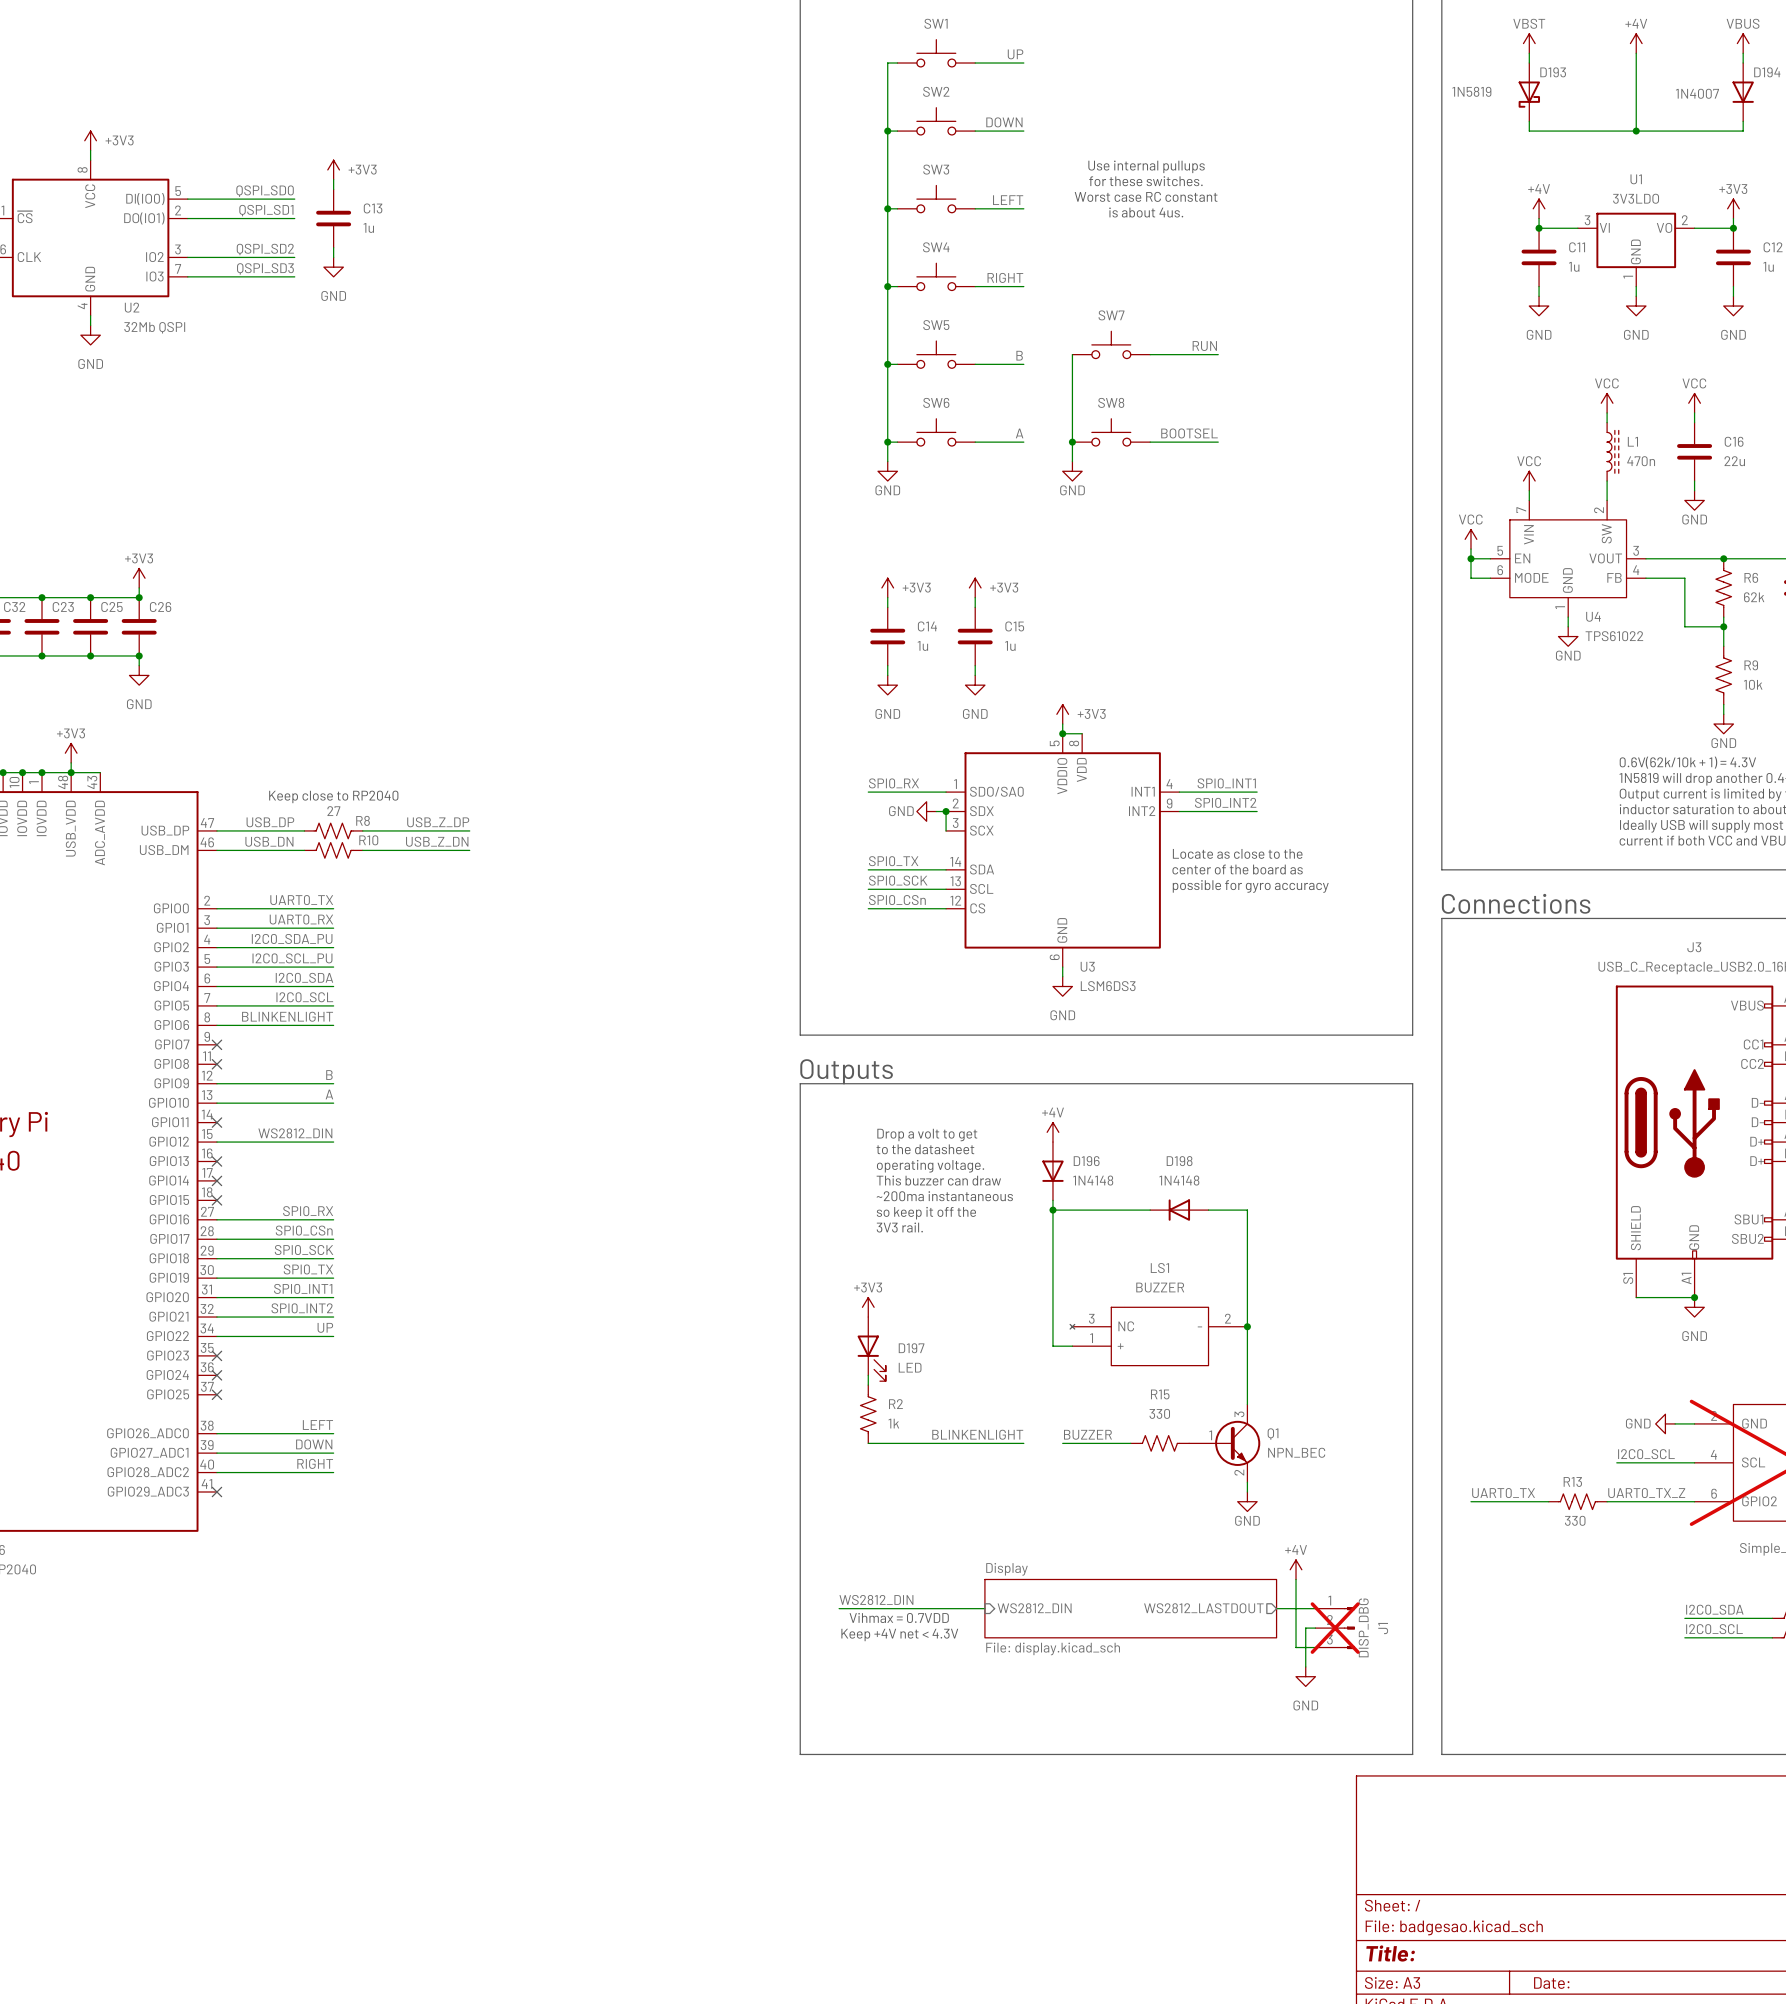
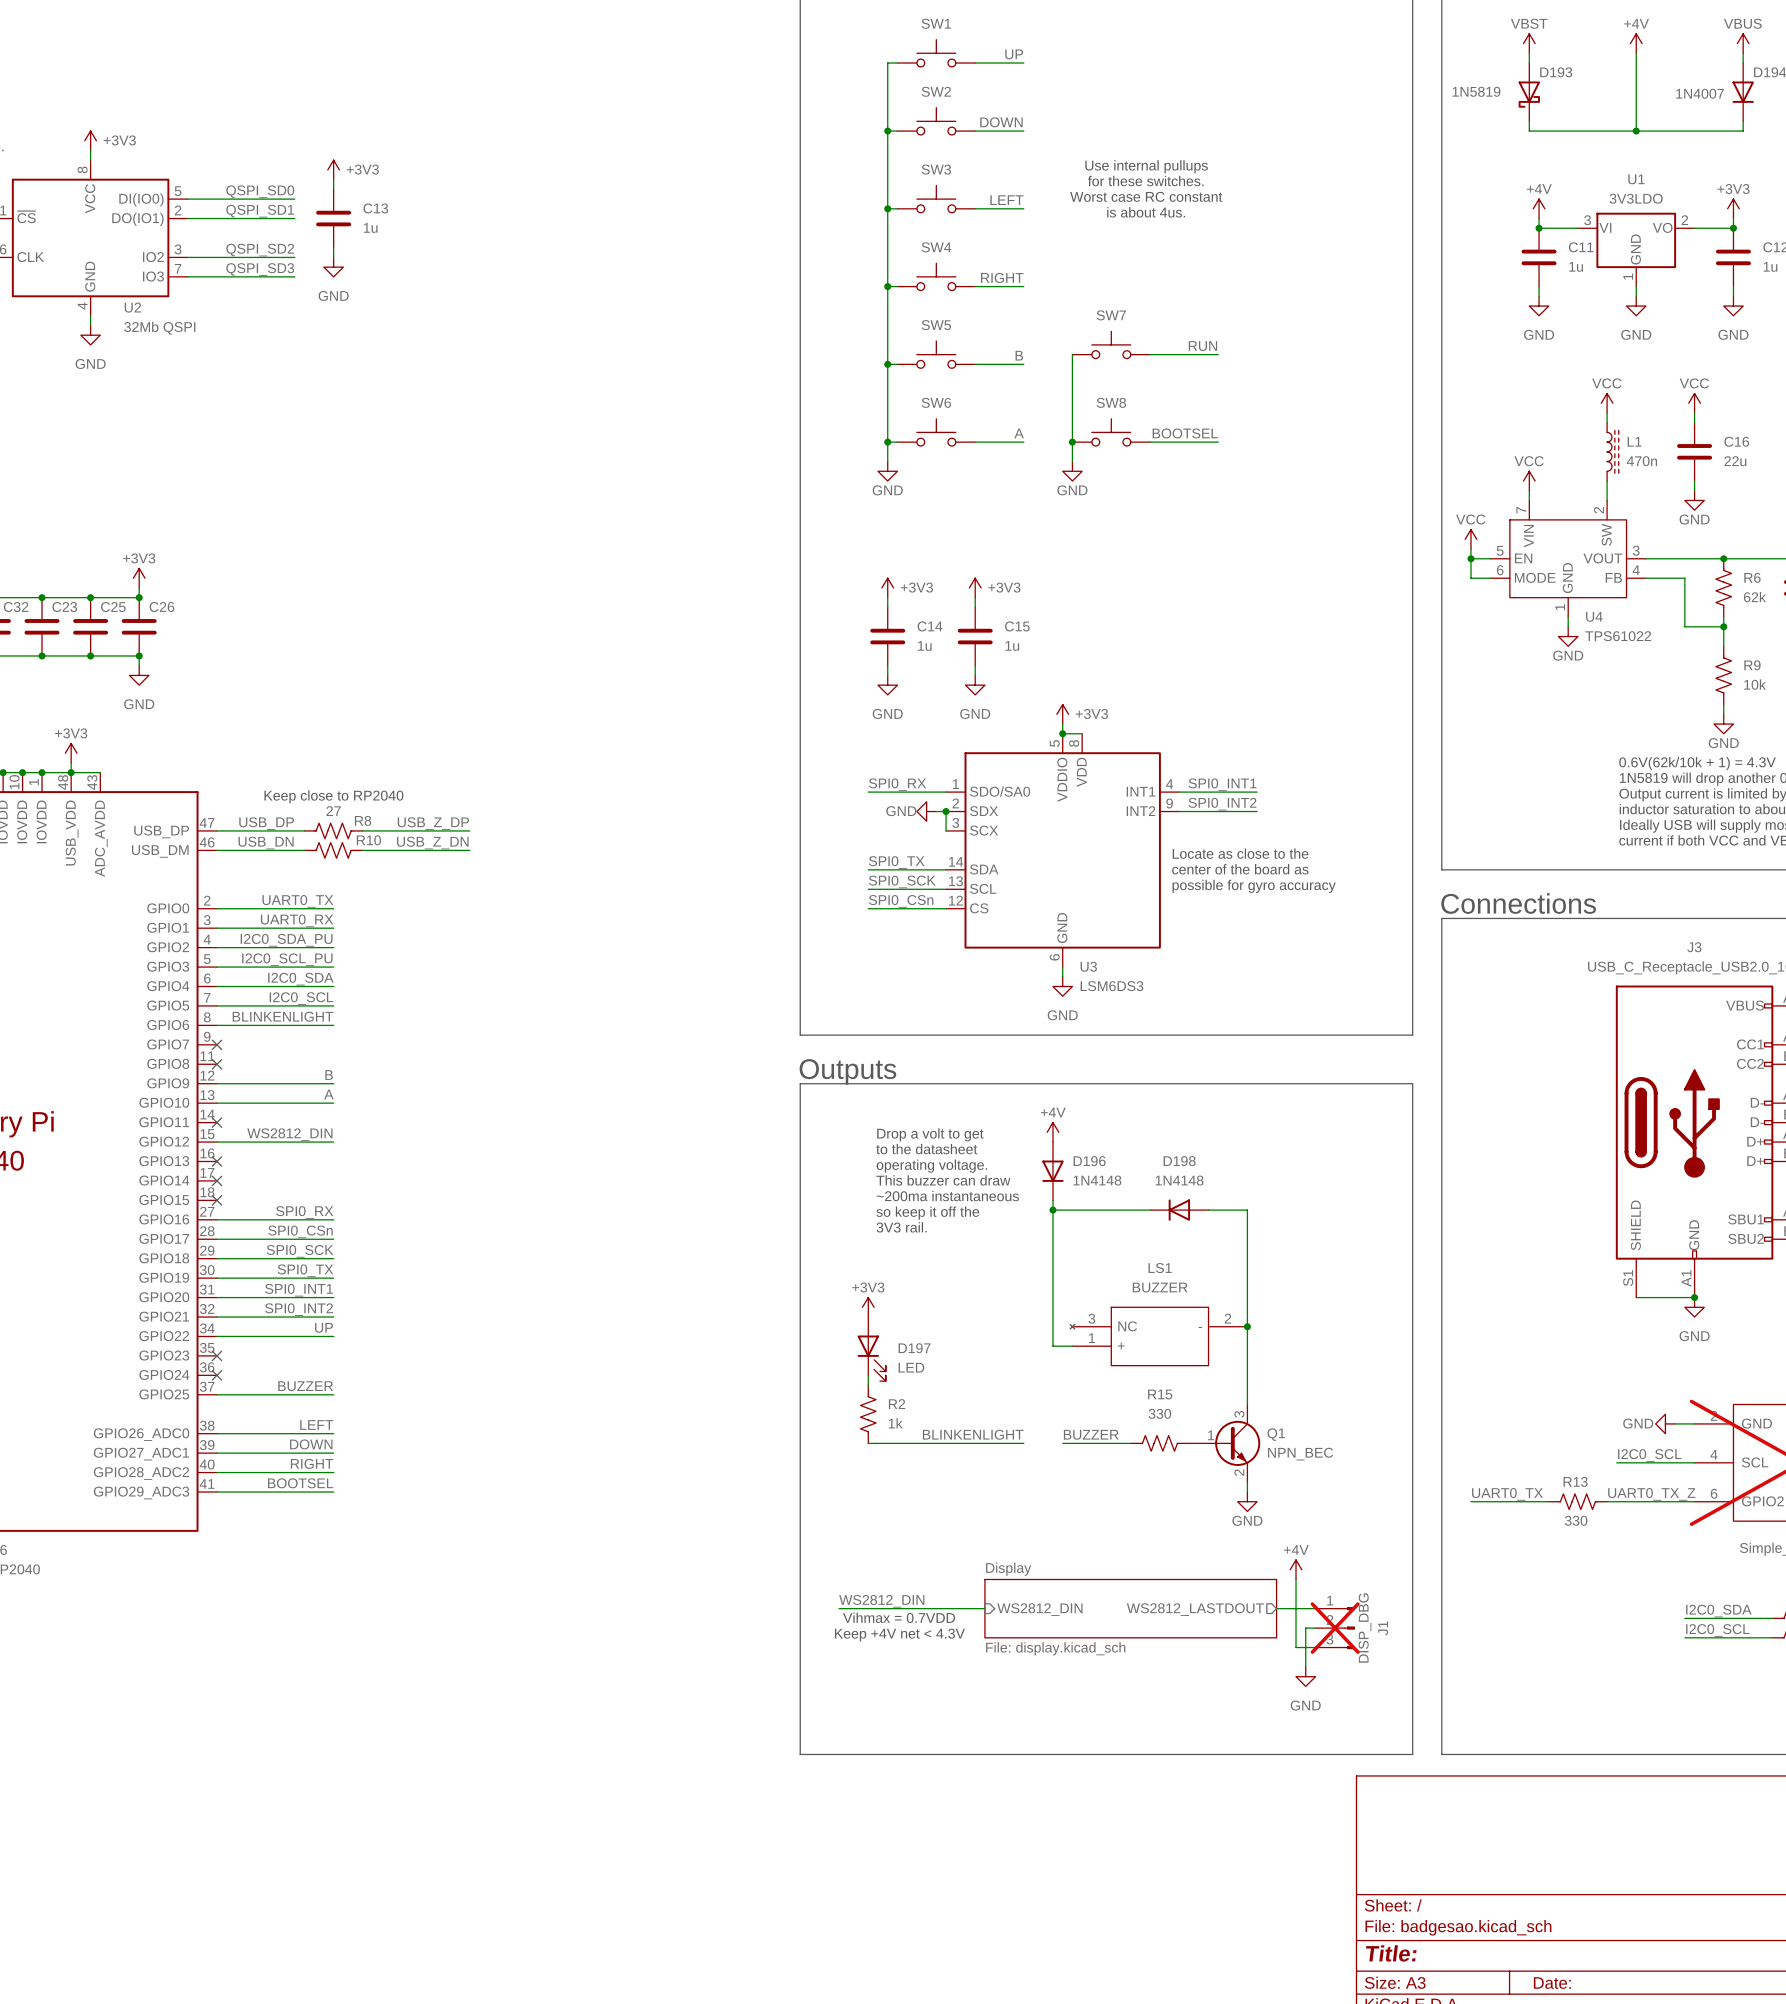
label: none -> BUZZER (305, 1386)
wire: none -> (216, 1394) (333, 1394)
no-connect mark: (216, 1394) -> none
label: none -> BOOTSEL (300, 1483)
wire: none -> (216, 1491) (333, 1491)
no-connect mark: (216, 1491) -> none

